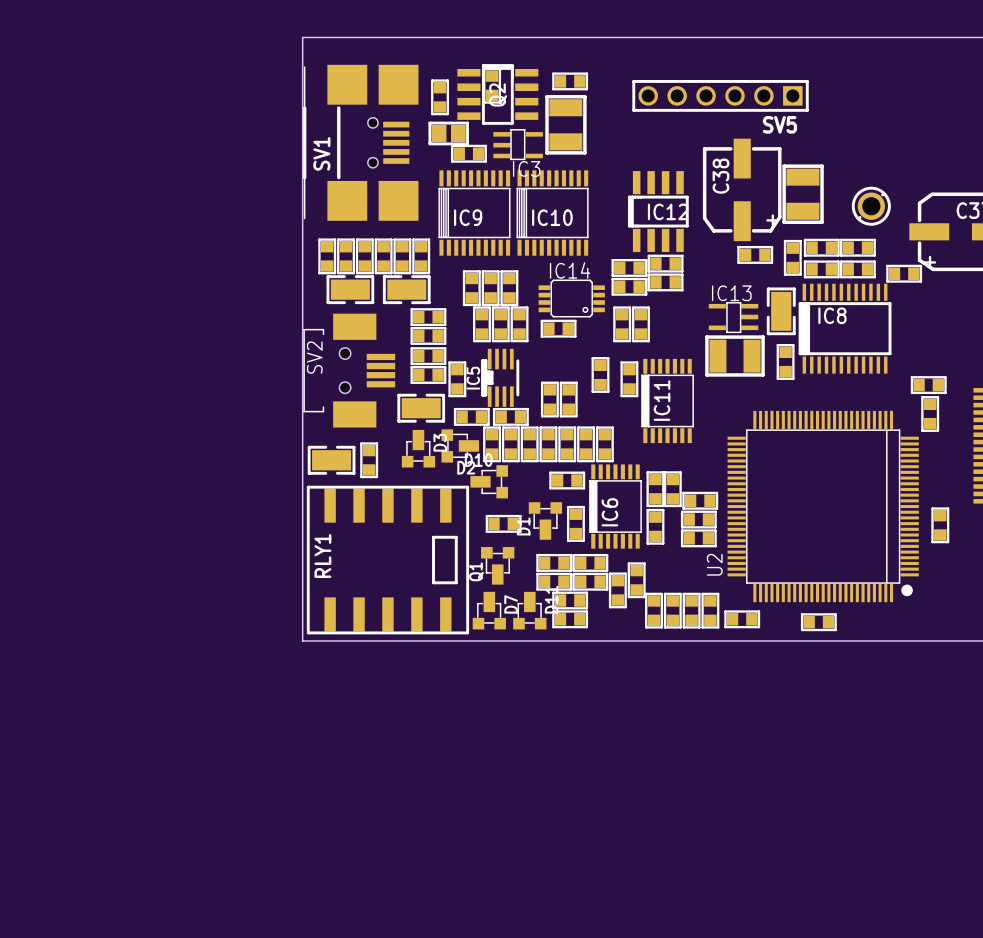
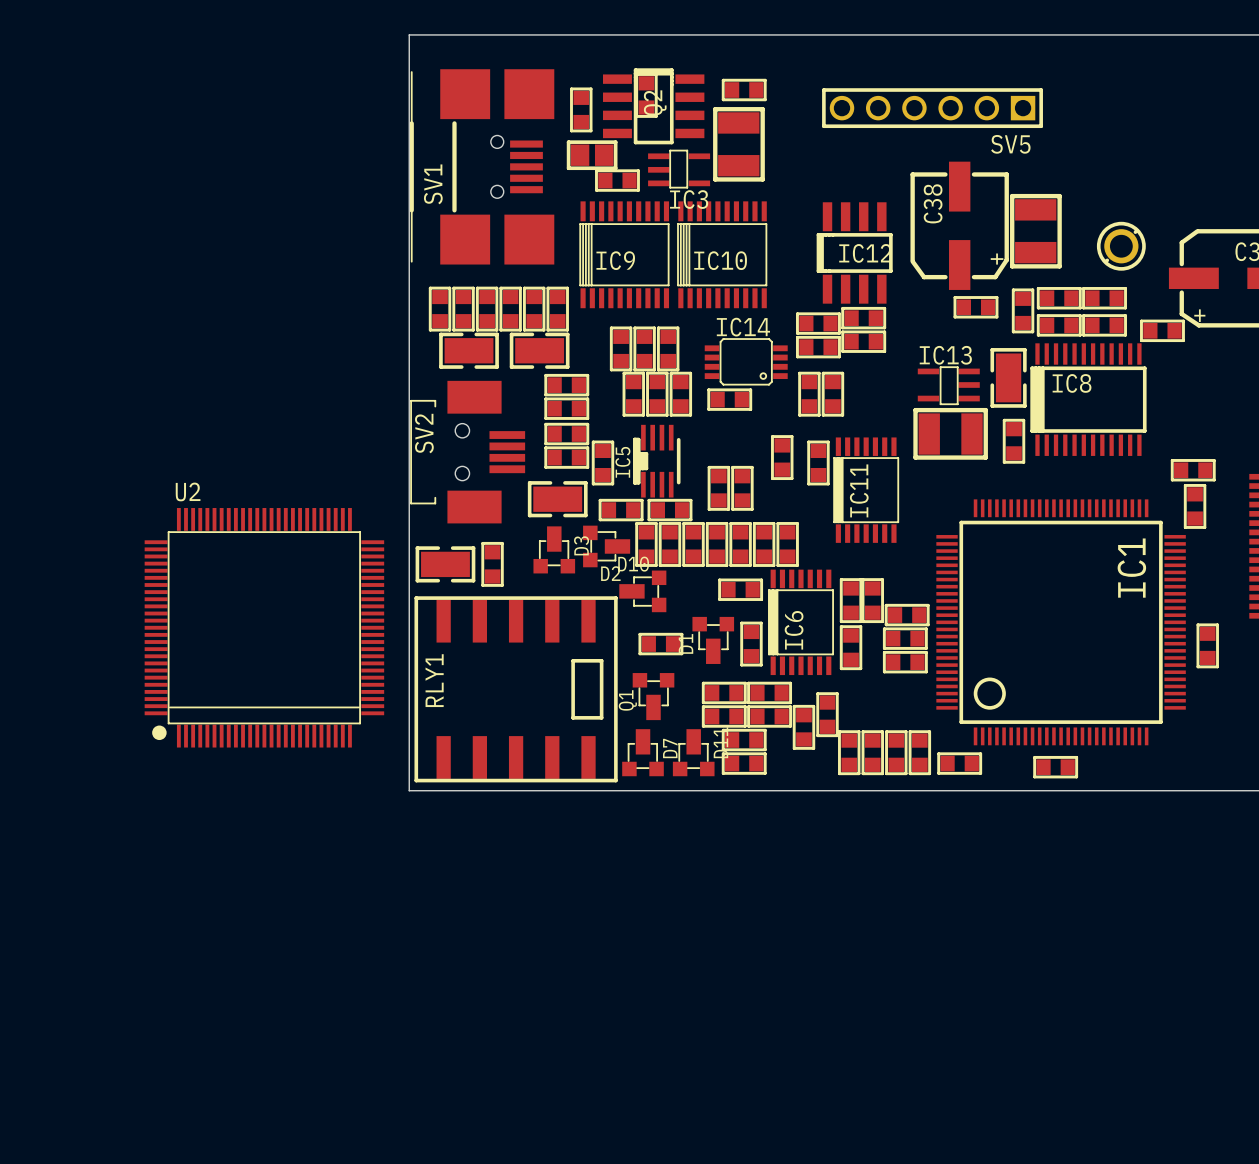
U2 rotation: 0° (823, 506) -> 90° clockwise (264, 627)
U2 position: (823, 506) -> (264, 627)
IC1: none -> (1061, 622)

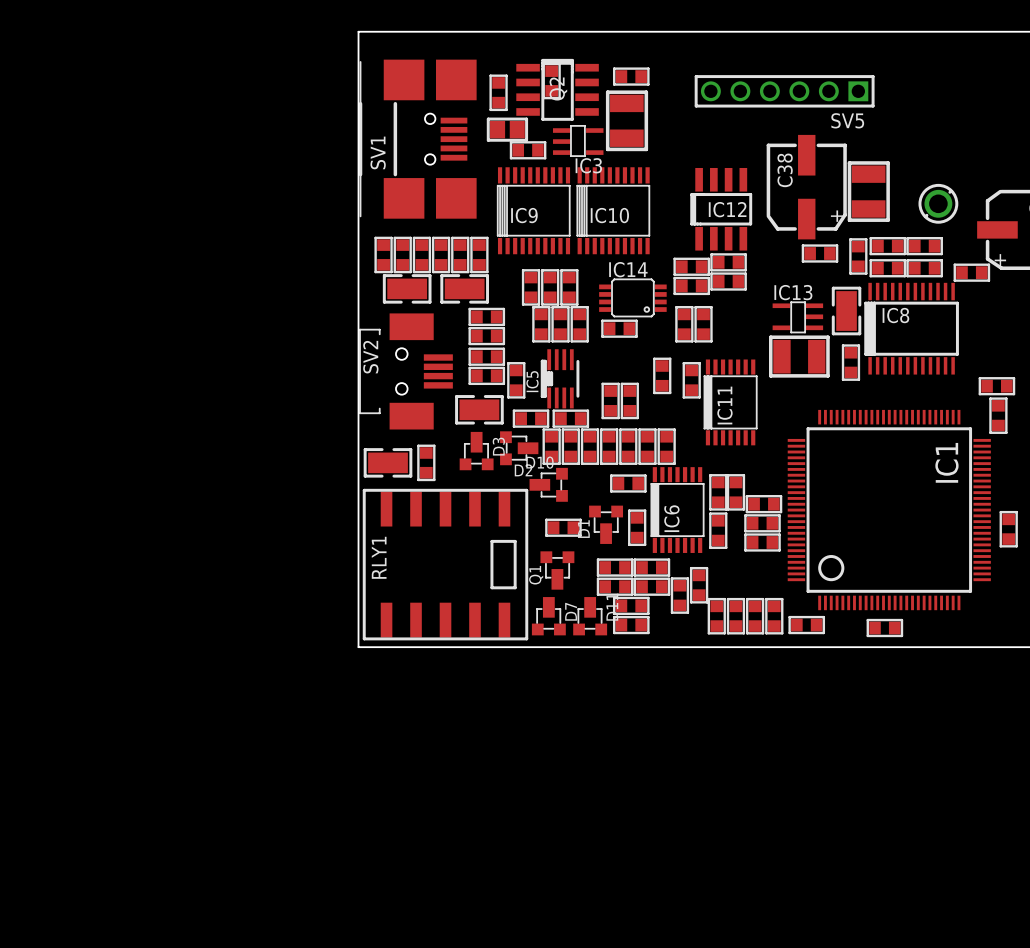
U2: (264, 627) -> none

